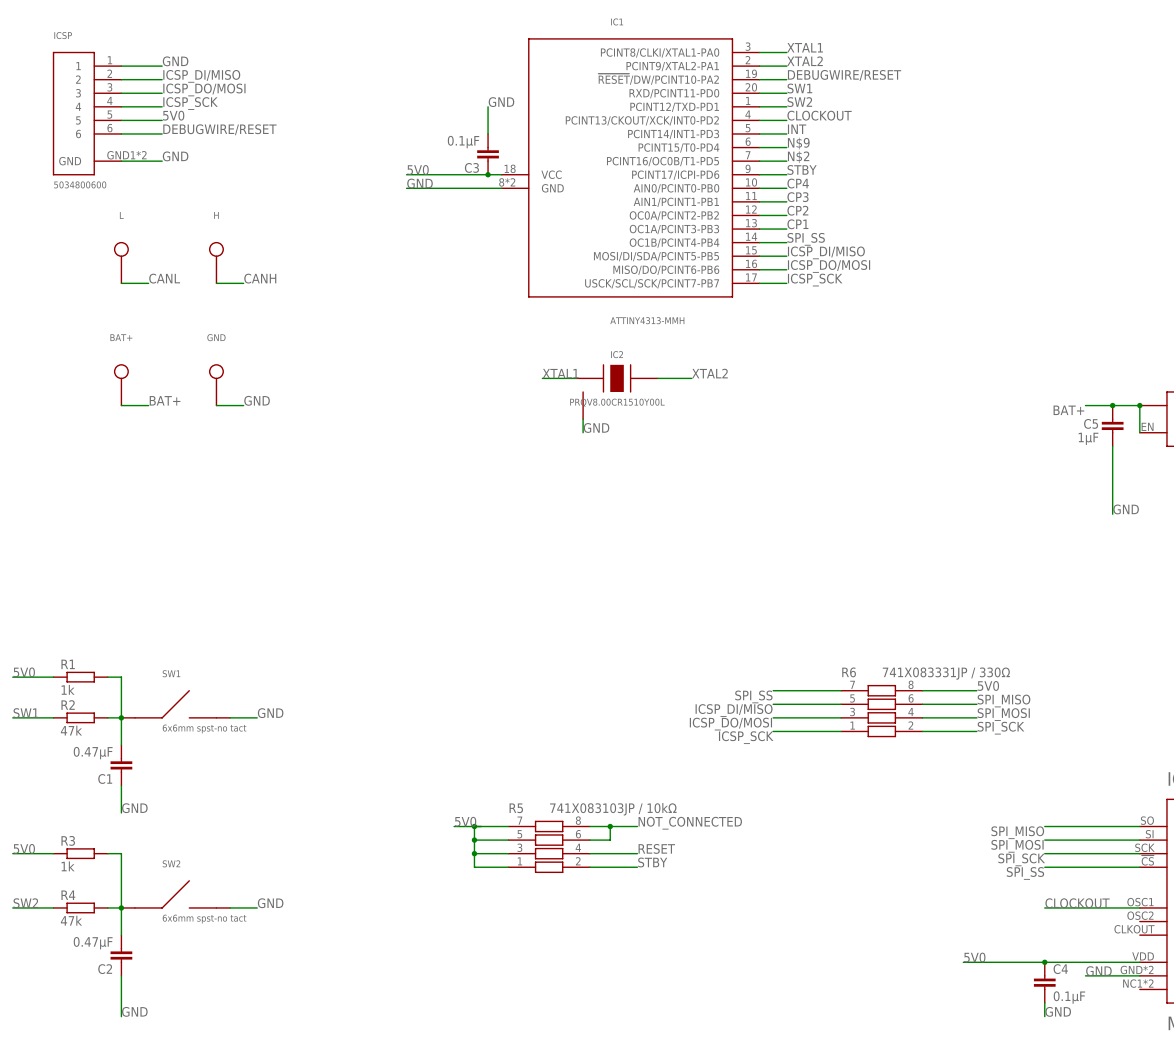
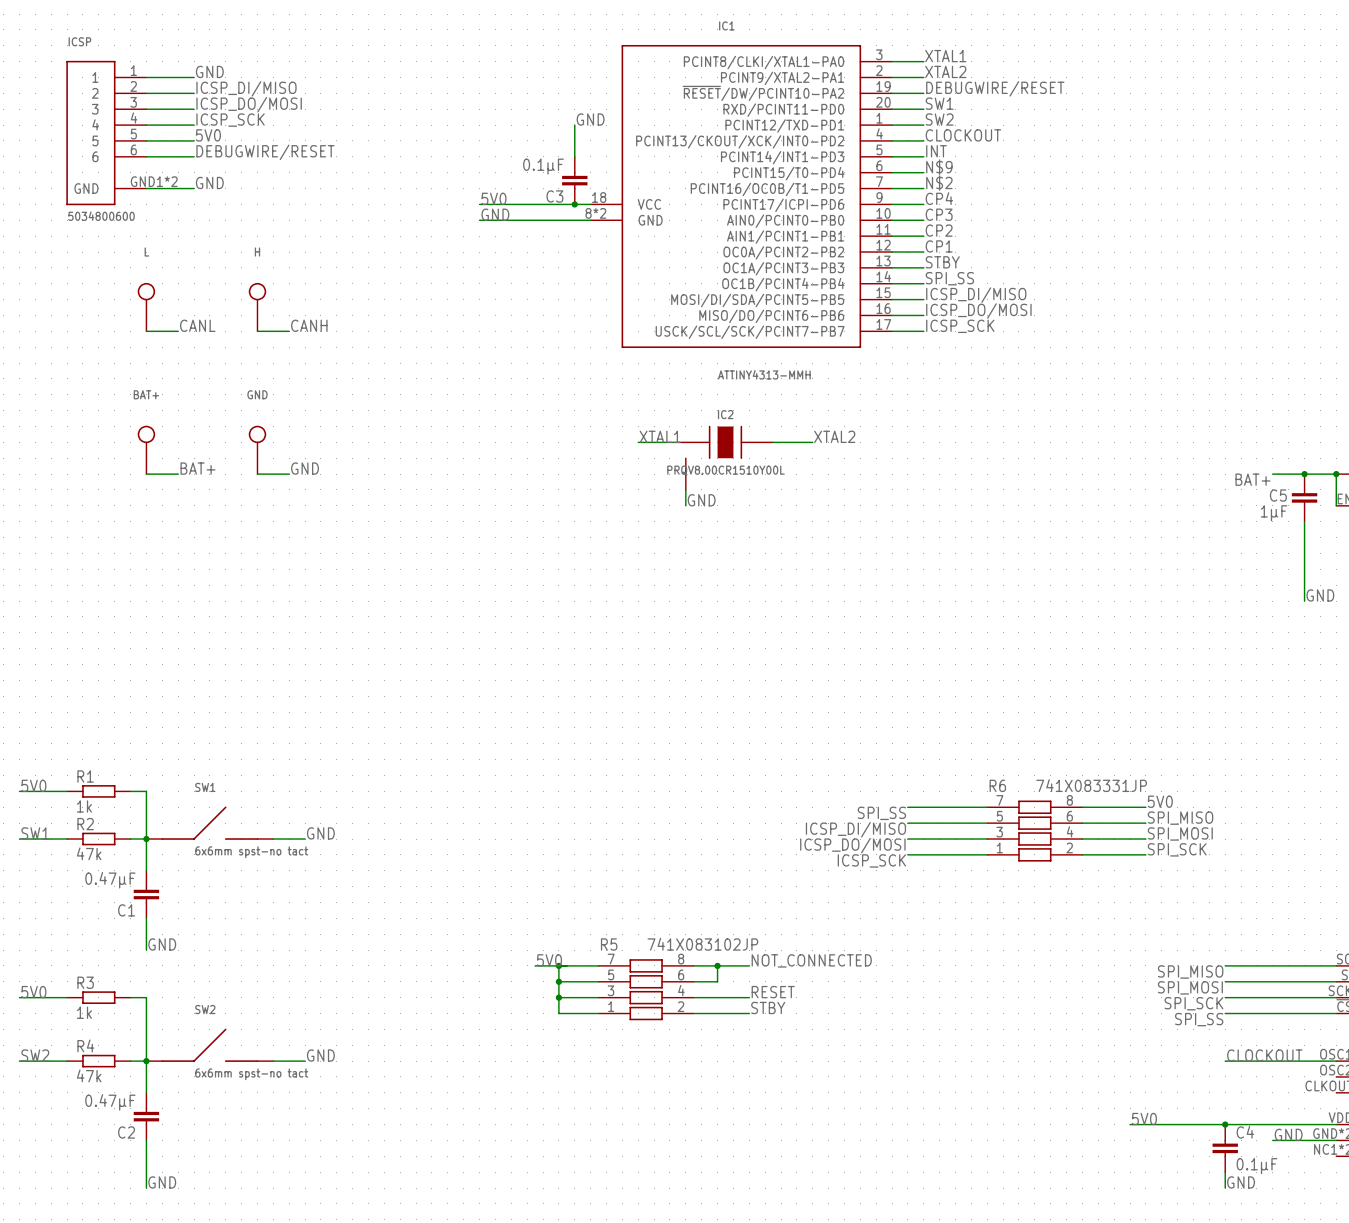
label: STBY (802, 169) -> CP4 (939, 198)
label: CP4 (798, 183) -> CP3 (939, 214)
label: CP3 (798, 197) -> CP2 (939, 230)
label: CP2 (797, 210) -> CP1 (939, 246)
label: CP1 (797, 224) -> STBY (942, 262)
R6 value: 741X083331JP / 330Ω (946, 673) -> 741X083331JP (1091, 785)
R5 value: 741X083103JP / 10kΩ (613, 809) -> 741X083102JP (702, 944)

